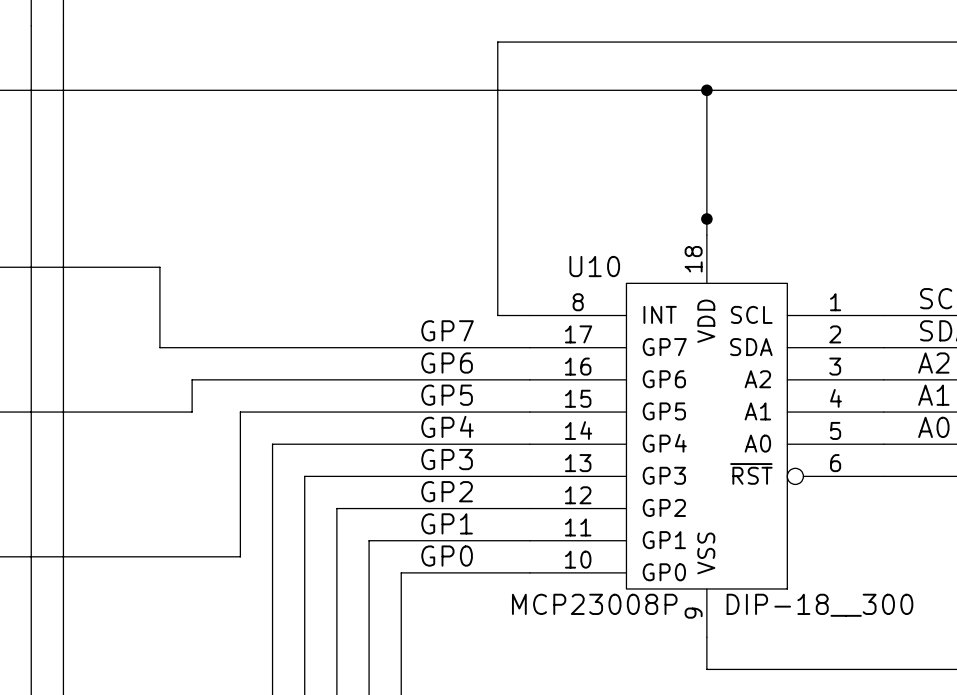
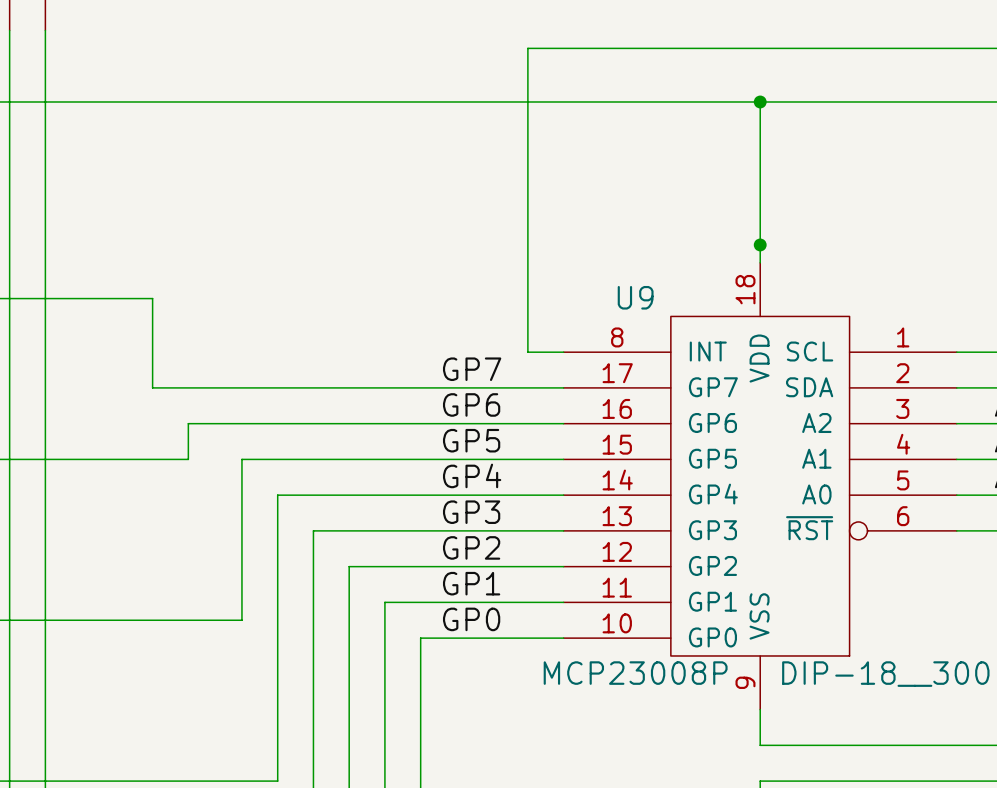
U10 name: U10 (594, 266) -> U9 (635, 297)

